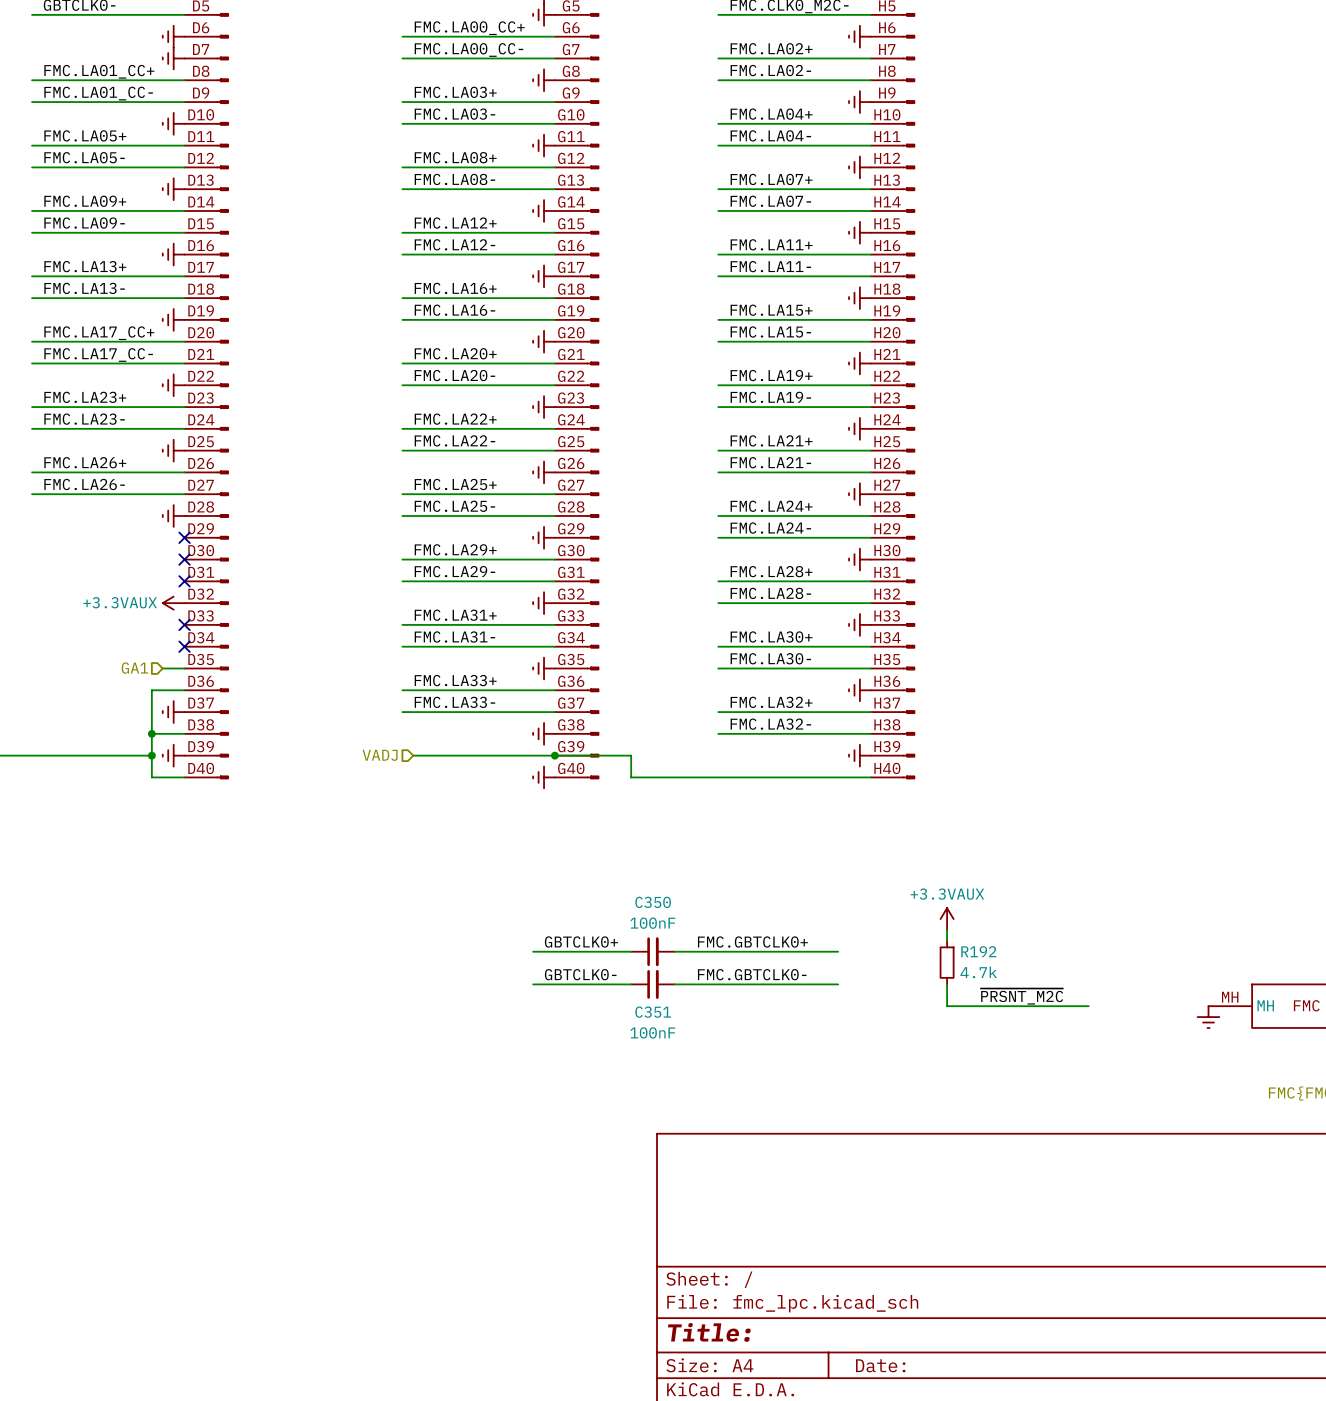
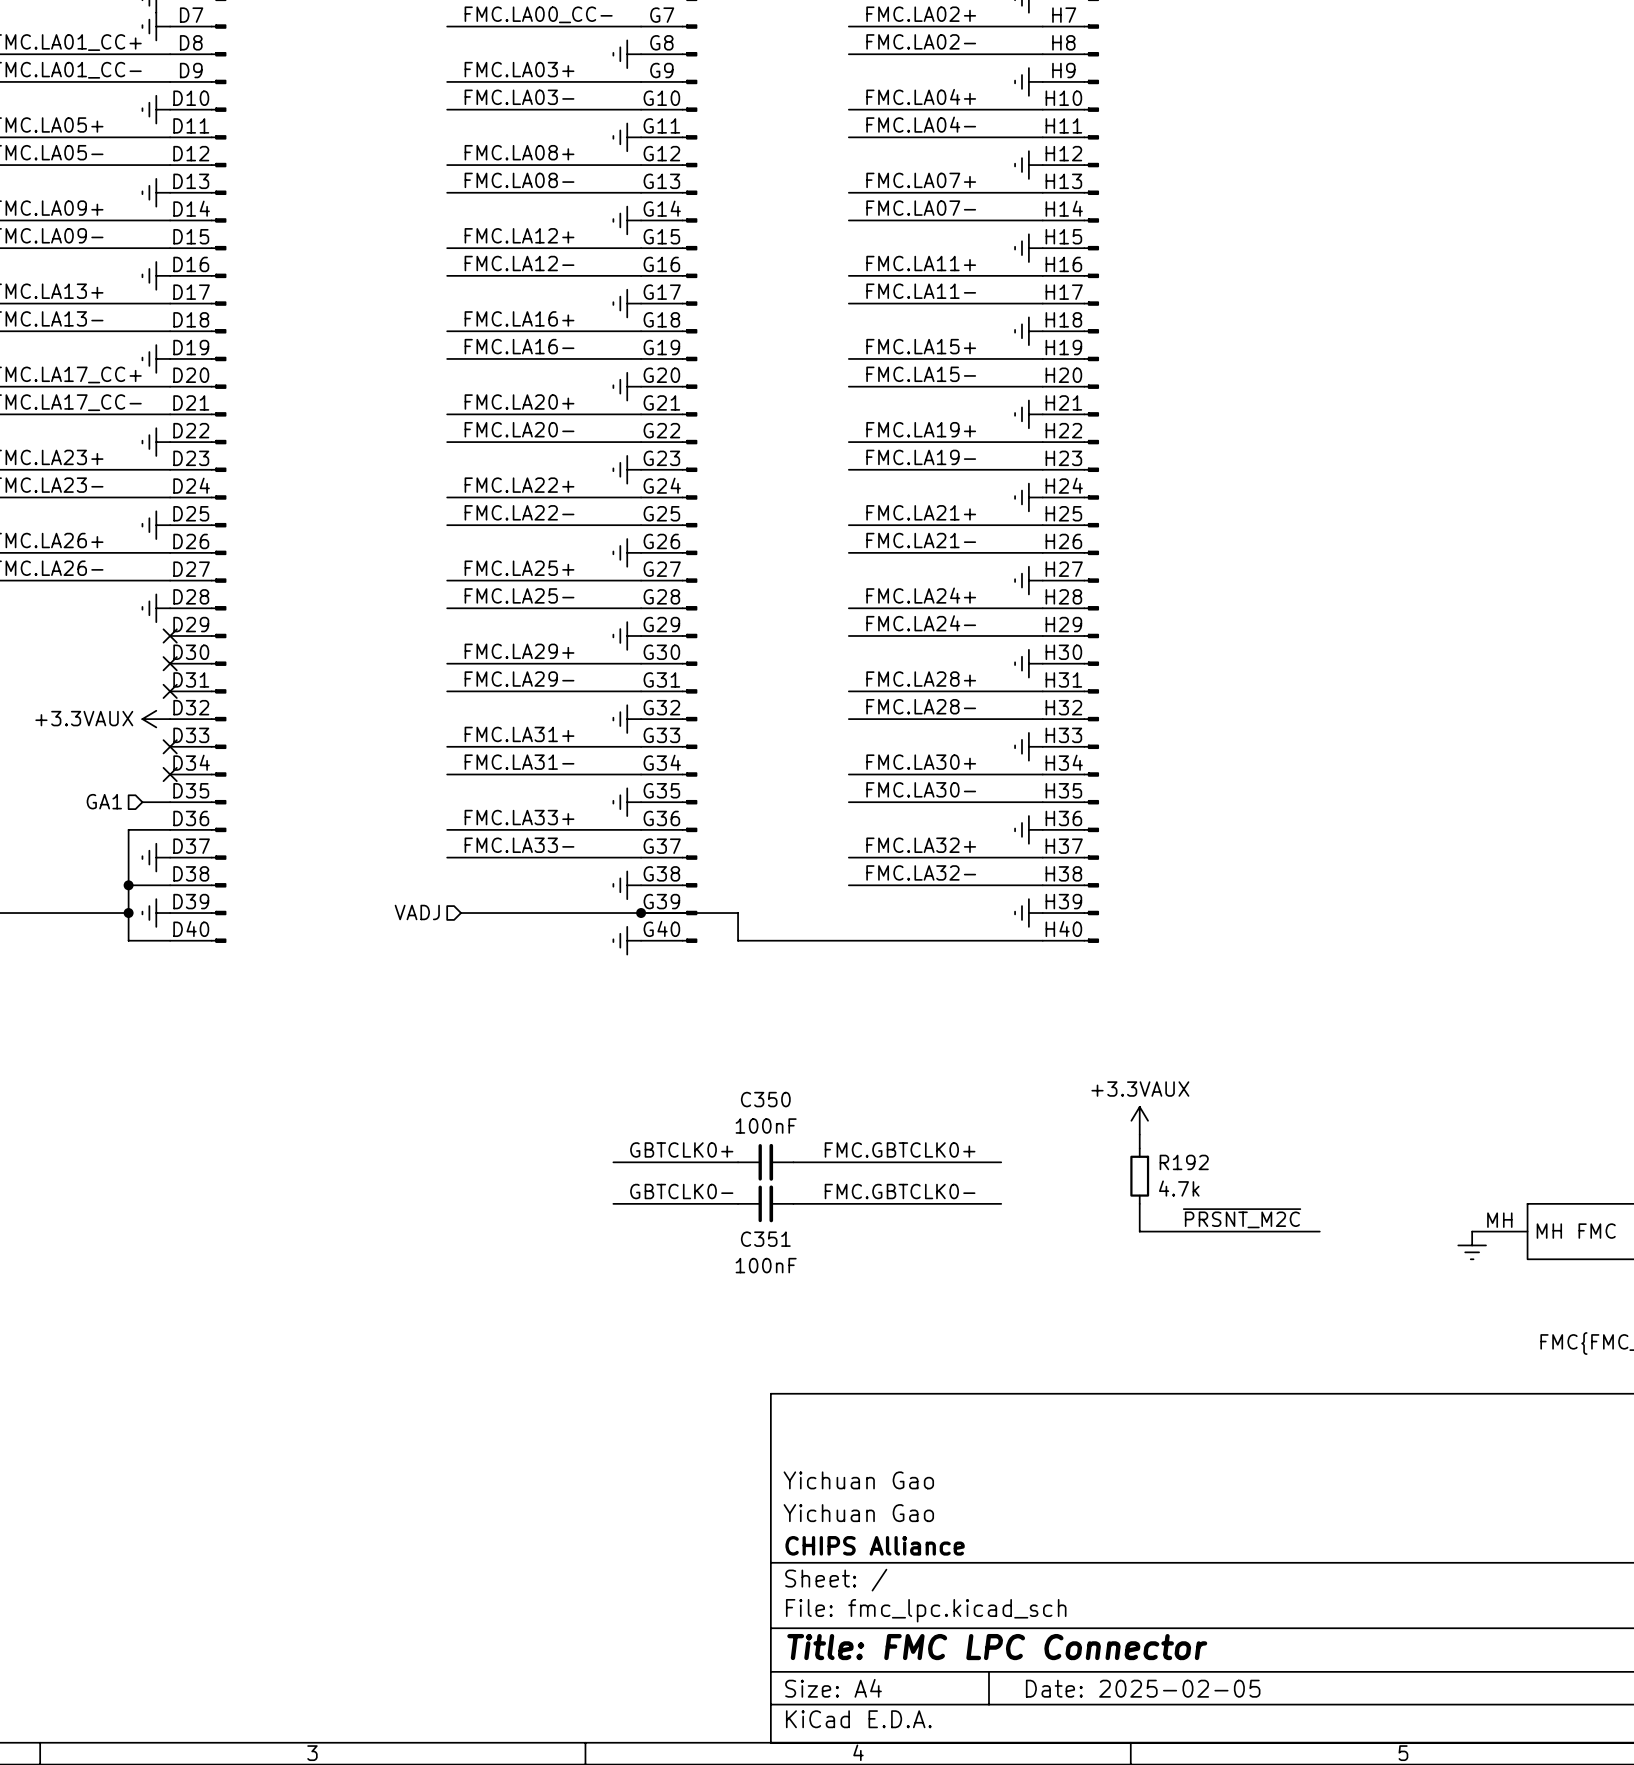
title block: none -> Yichuan Gao (858, 1480)
title block: none -> Yichuan Gao (858, 1513)
title block: none -> CHIPS Alliance (875, 1545)
title block: Title: (709, 1332) -> Title: FMC LPC Connector (997, 1647)
title block: Date: (880, 1365) -> Date: 2025-02-05 (1143, 1688)

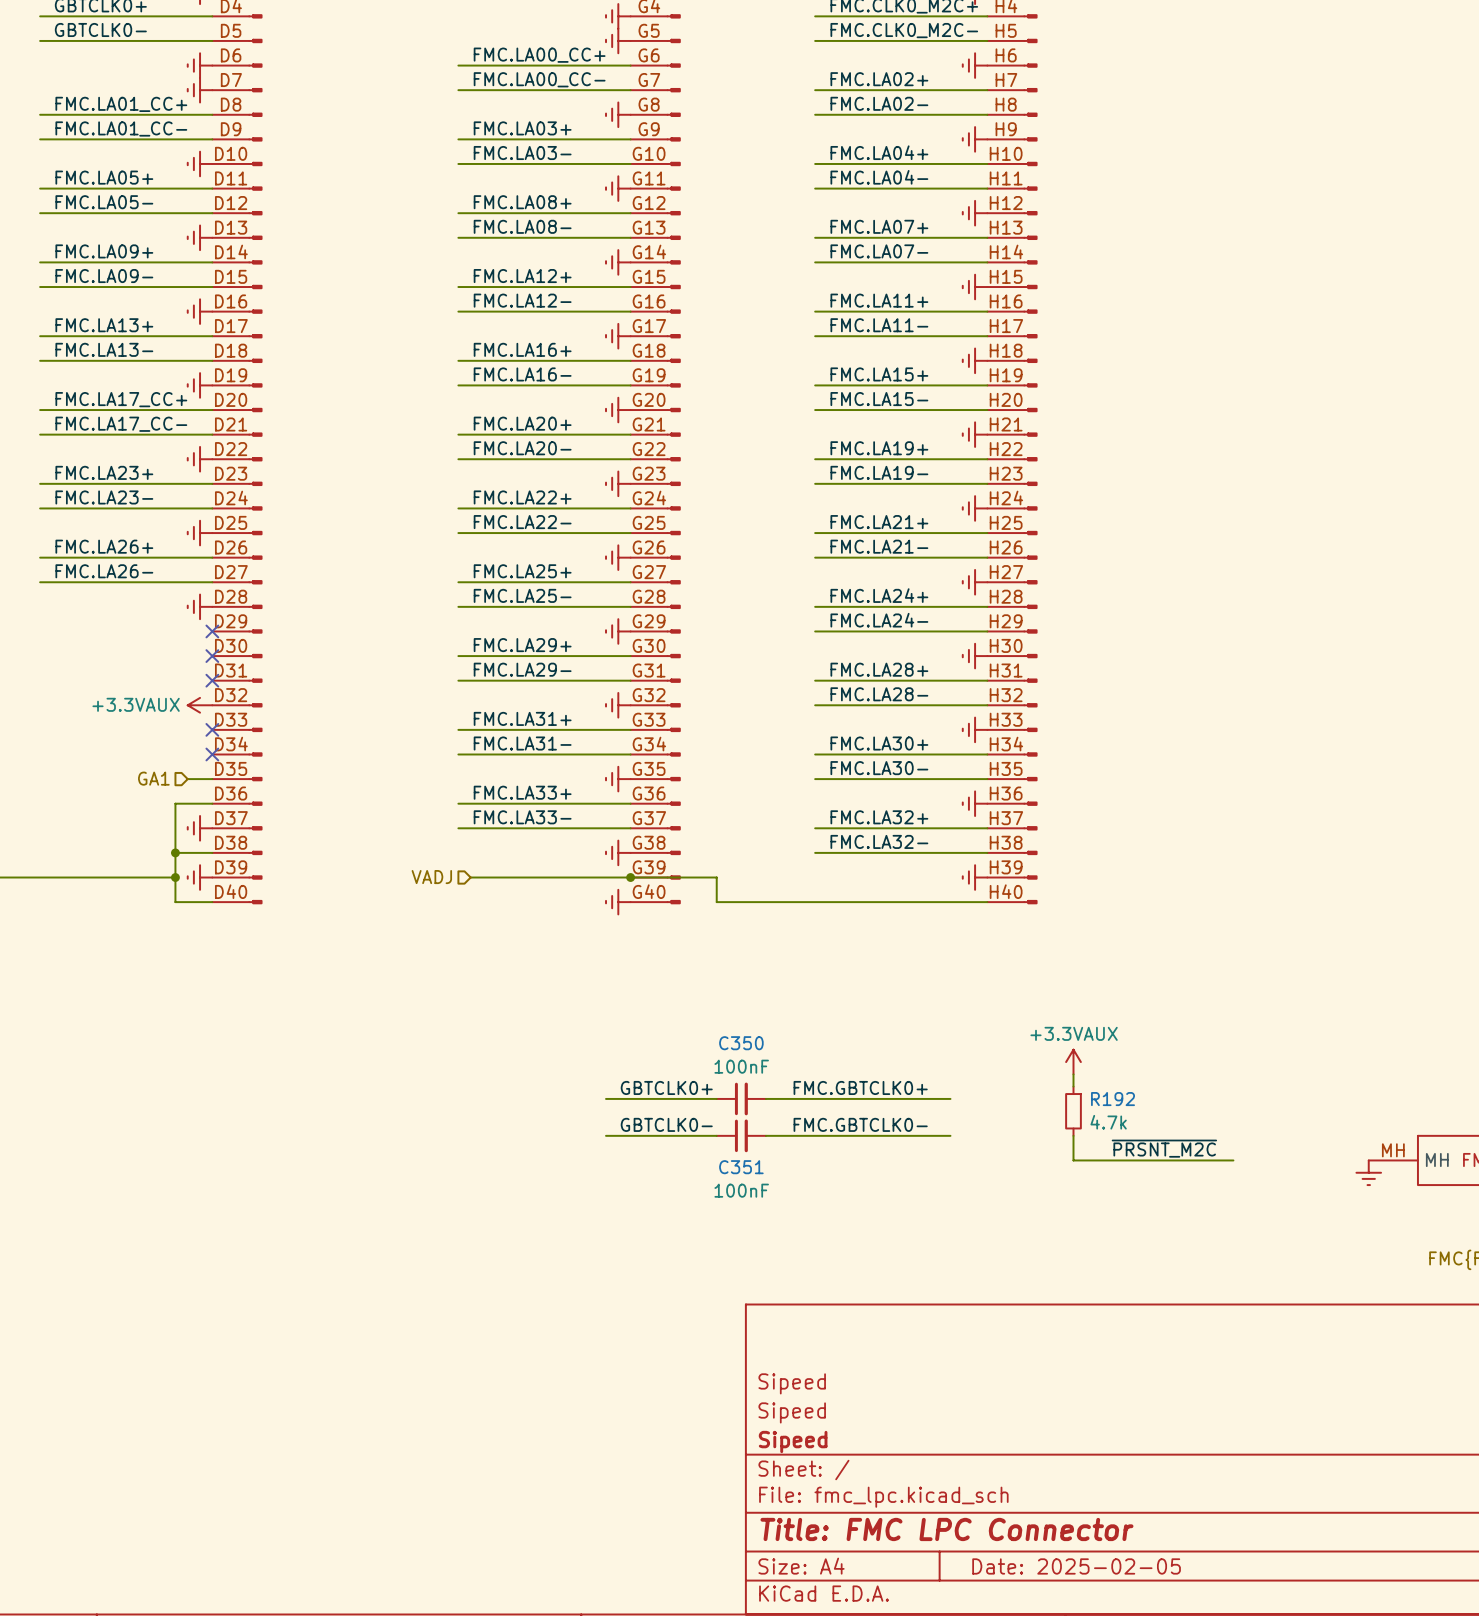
title block: Yichuan Gao (858, 1480) -> Sipeed (792, 1383)
title block: Yichuan Gao (858, 1513) -> Sipeed (792, 1412)
title block: CHIPS Alliance (875, 1545) -> Sipeed (793, 1441)

